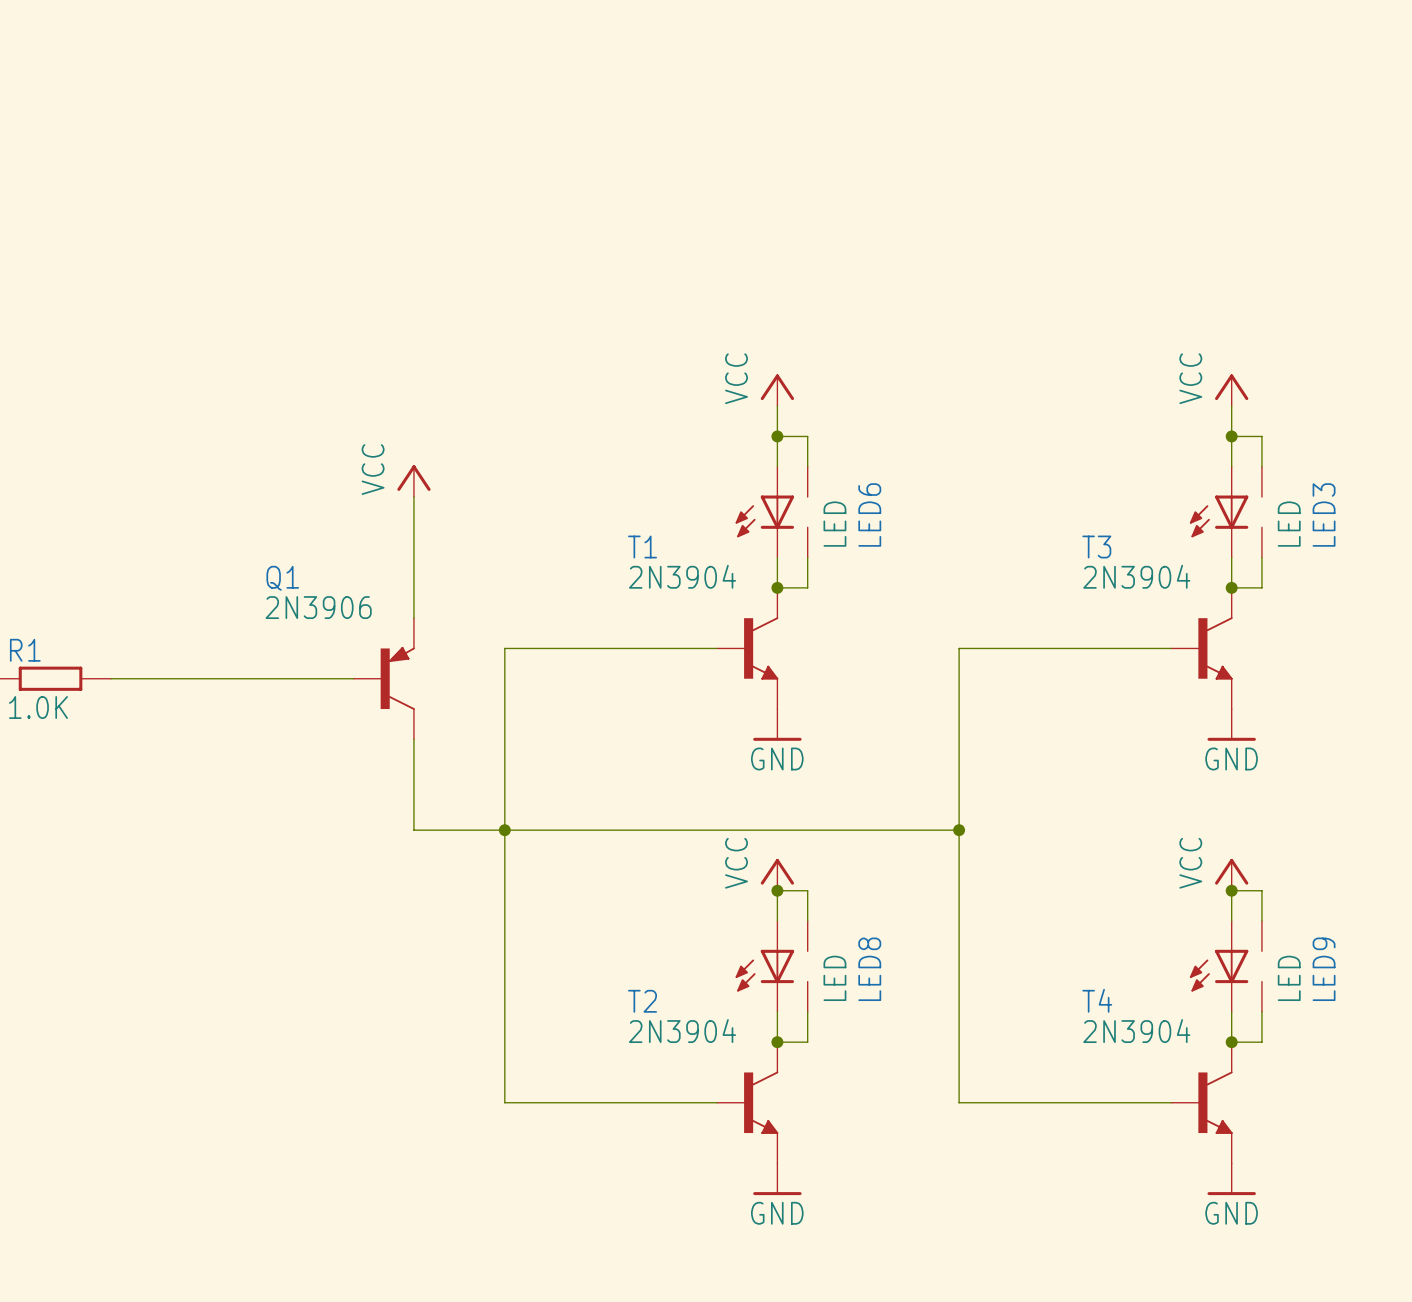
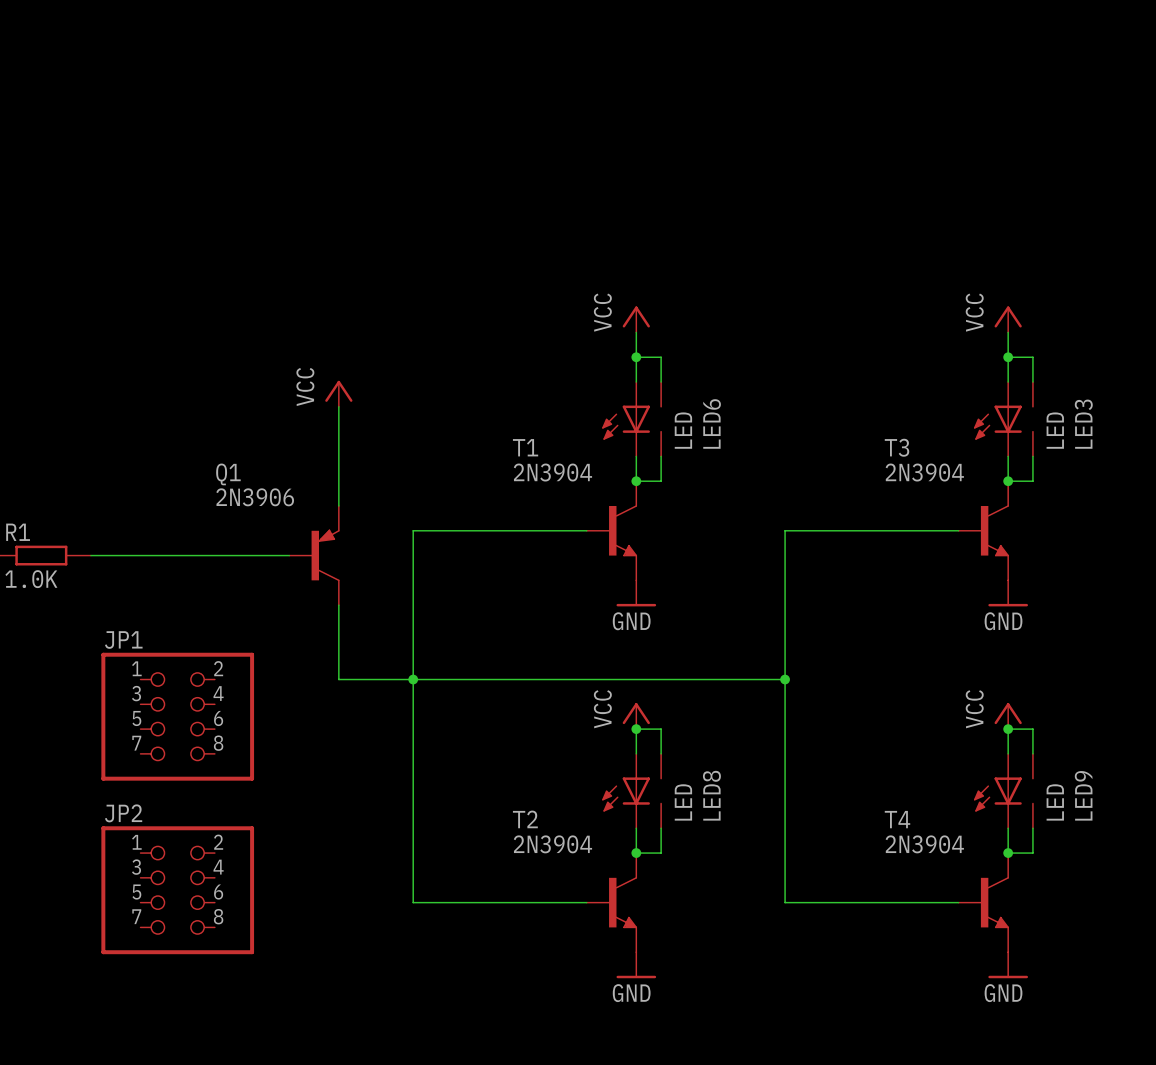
JP1: none -> (177, 716)
JP2: none -> (177, 890)

